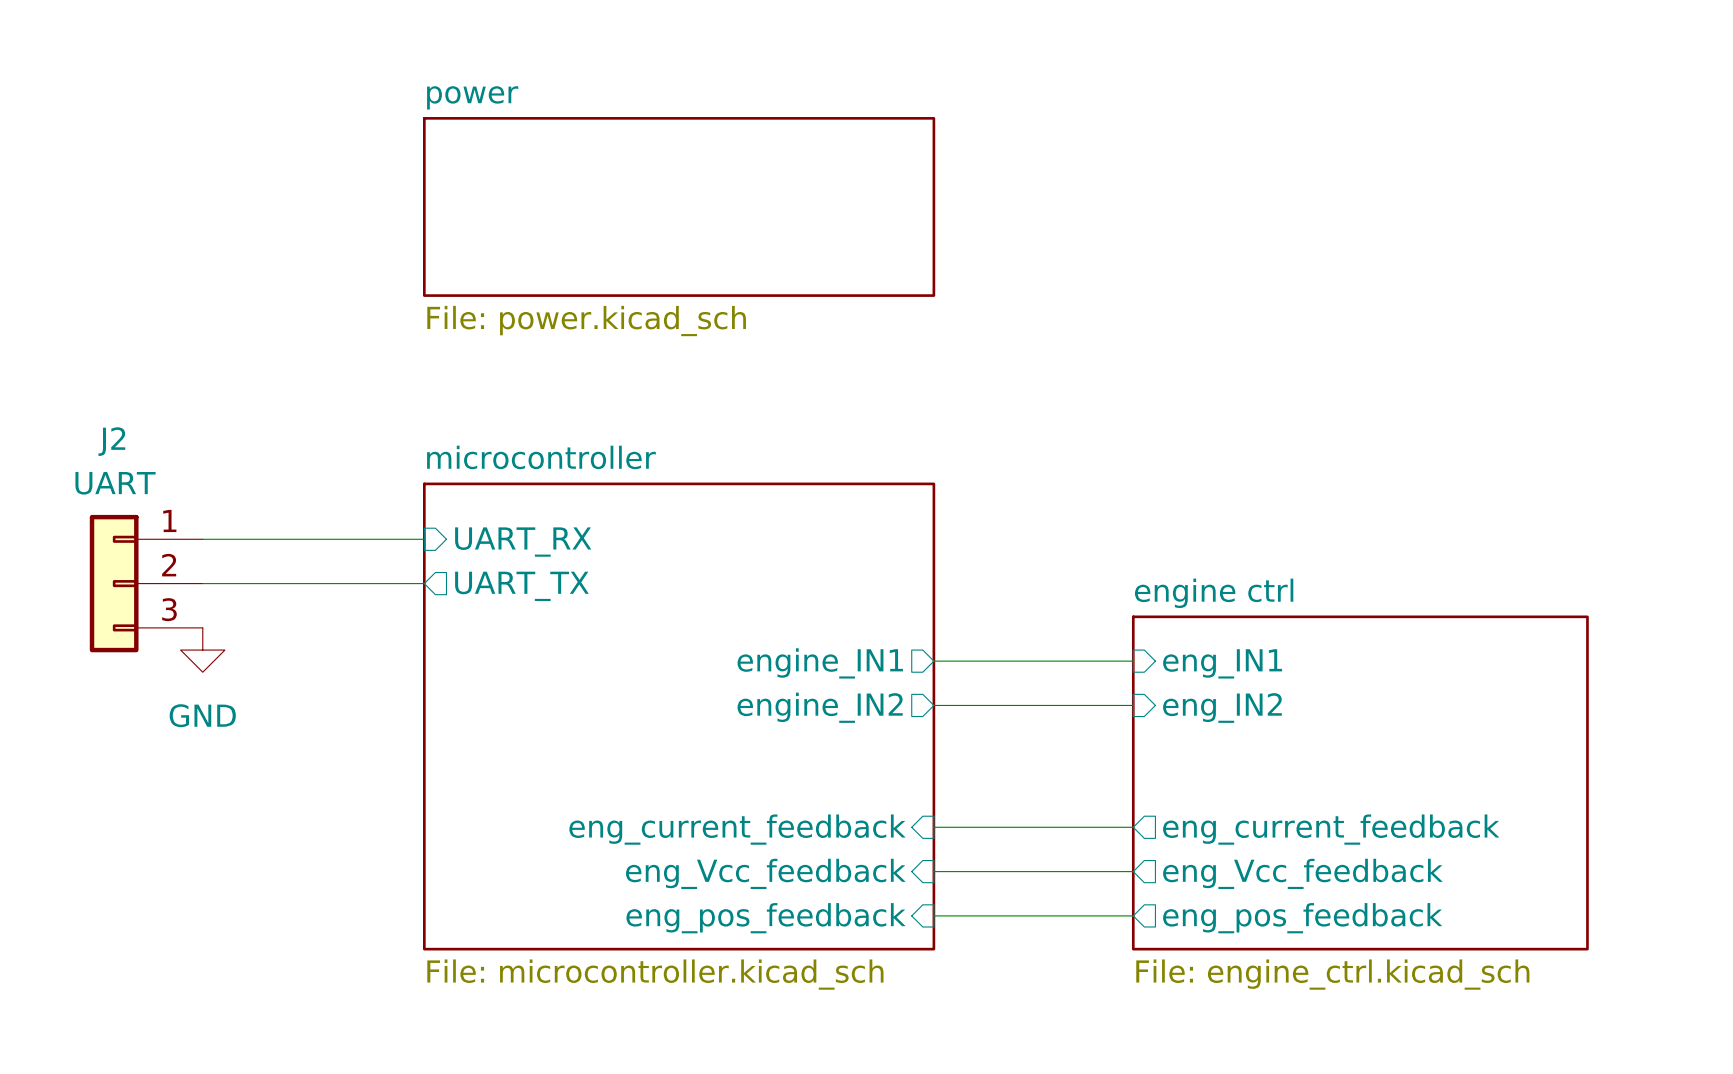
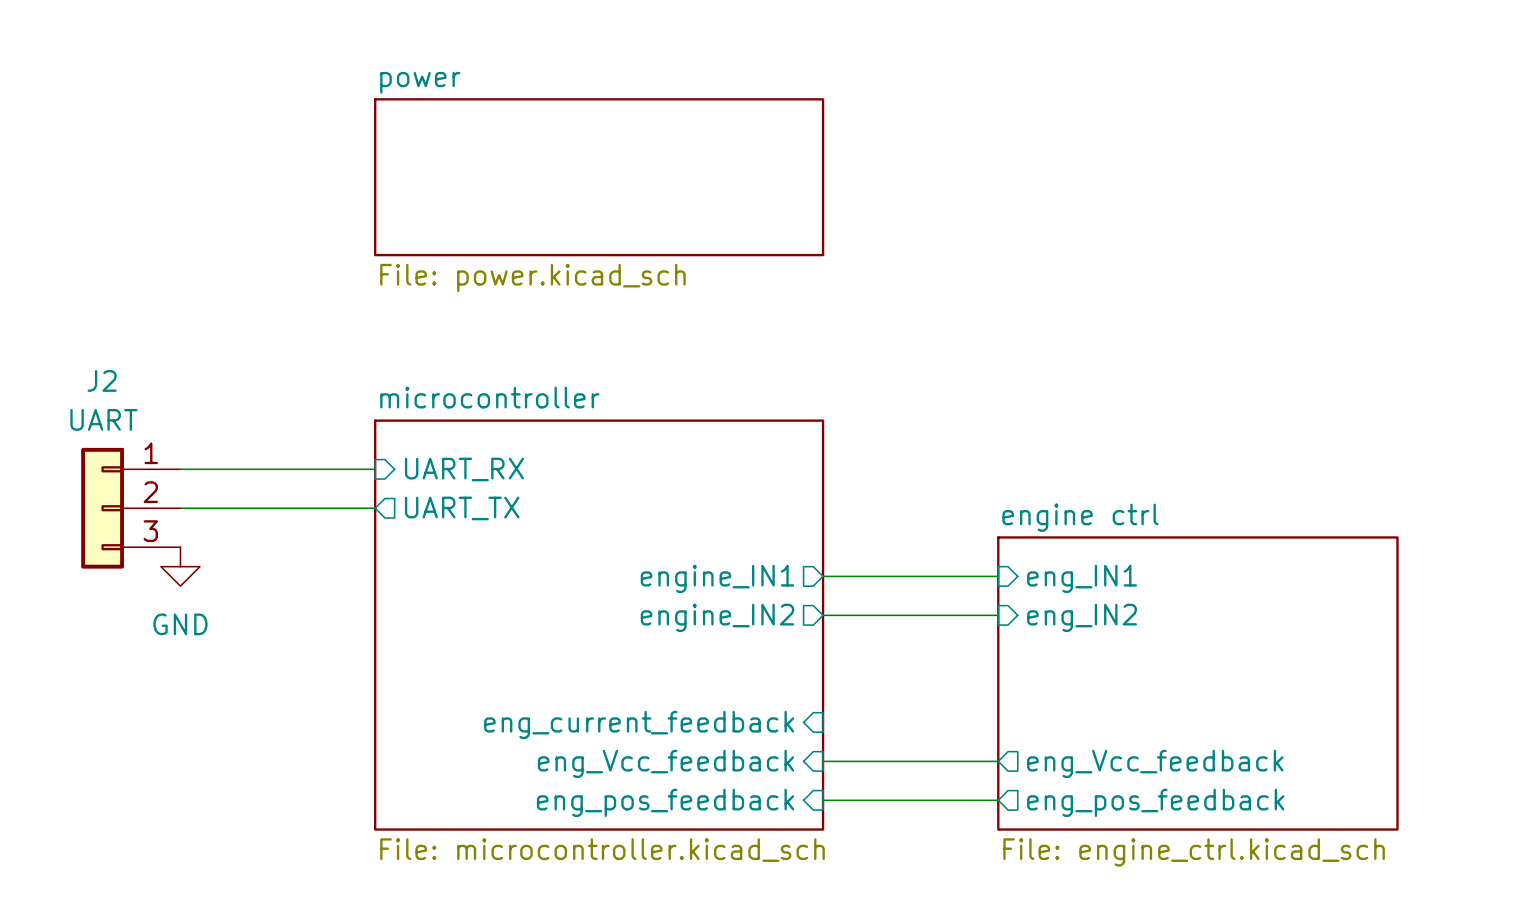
wire: (933, 827) (1133, 827) -> none
sheet pin: eng_current_feedback (1331, 829) -> none

